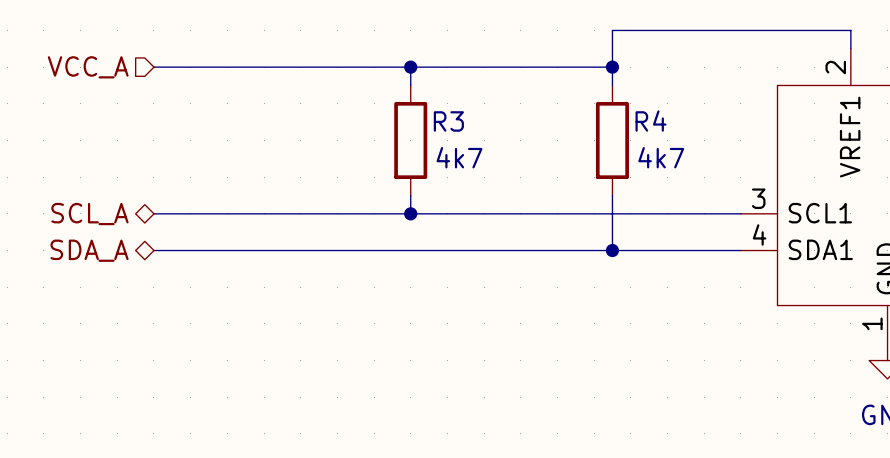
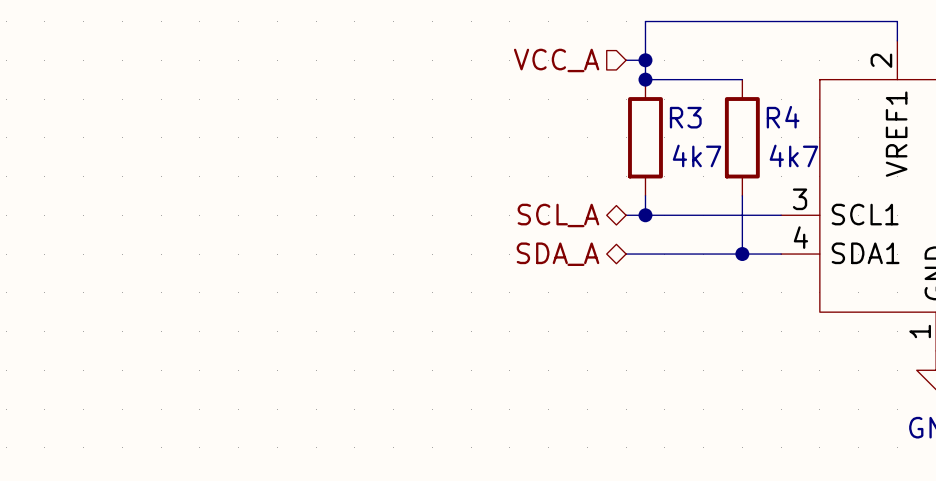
hierarchical label: VCC_A (88, 67) -> none
wire: (153, 67) (594, 67) -> none
wire: (410, 67) (410, 85) -> none
junction: (410, 67) -> none
hierarchical label: none -> VCC_A (556, 60)
wire: none -> (645, 79) (742, 79)
junction: none -> (645, 79)
R4 name: R4 (651, 121) -> R3 (685, 117)
R3: 4k7 (410, 140) -> none
R4: none -> 4k7 (742, 137)
wire: (410, 195) (410, 213) -> none
wire: none -> (742, 195) (742, 254)
wire: (153, 213) (594, 213) -> none
junction: (410, 213) -> none
wire: (612, 213) (612, 250) -> none
hierarchical label: SCL_A (89, 214) -> none
hierarchical label: none -> SCL_A (558, 215)
hierarchical label: SDA_A (89, 250) -> none
wire: (153, 250) (594, 250) -> none
hierarchical label: none -> SDA_A (557, 254)
junction position: (612, 250) -> (645, 215)
junction: none -> (742, 254)

